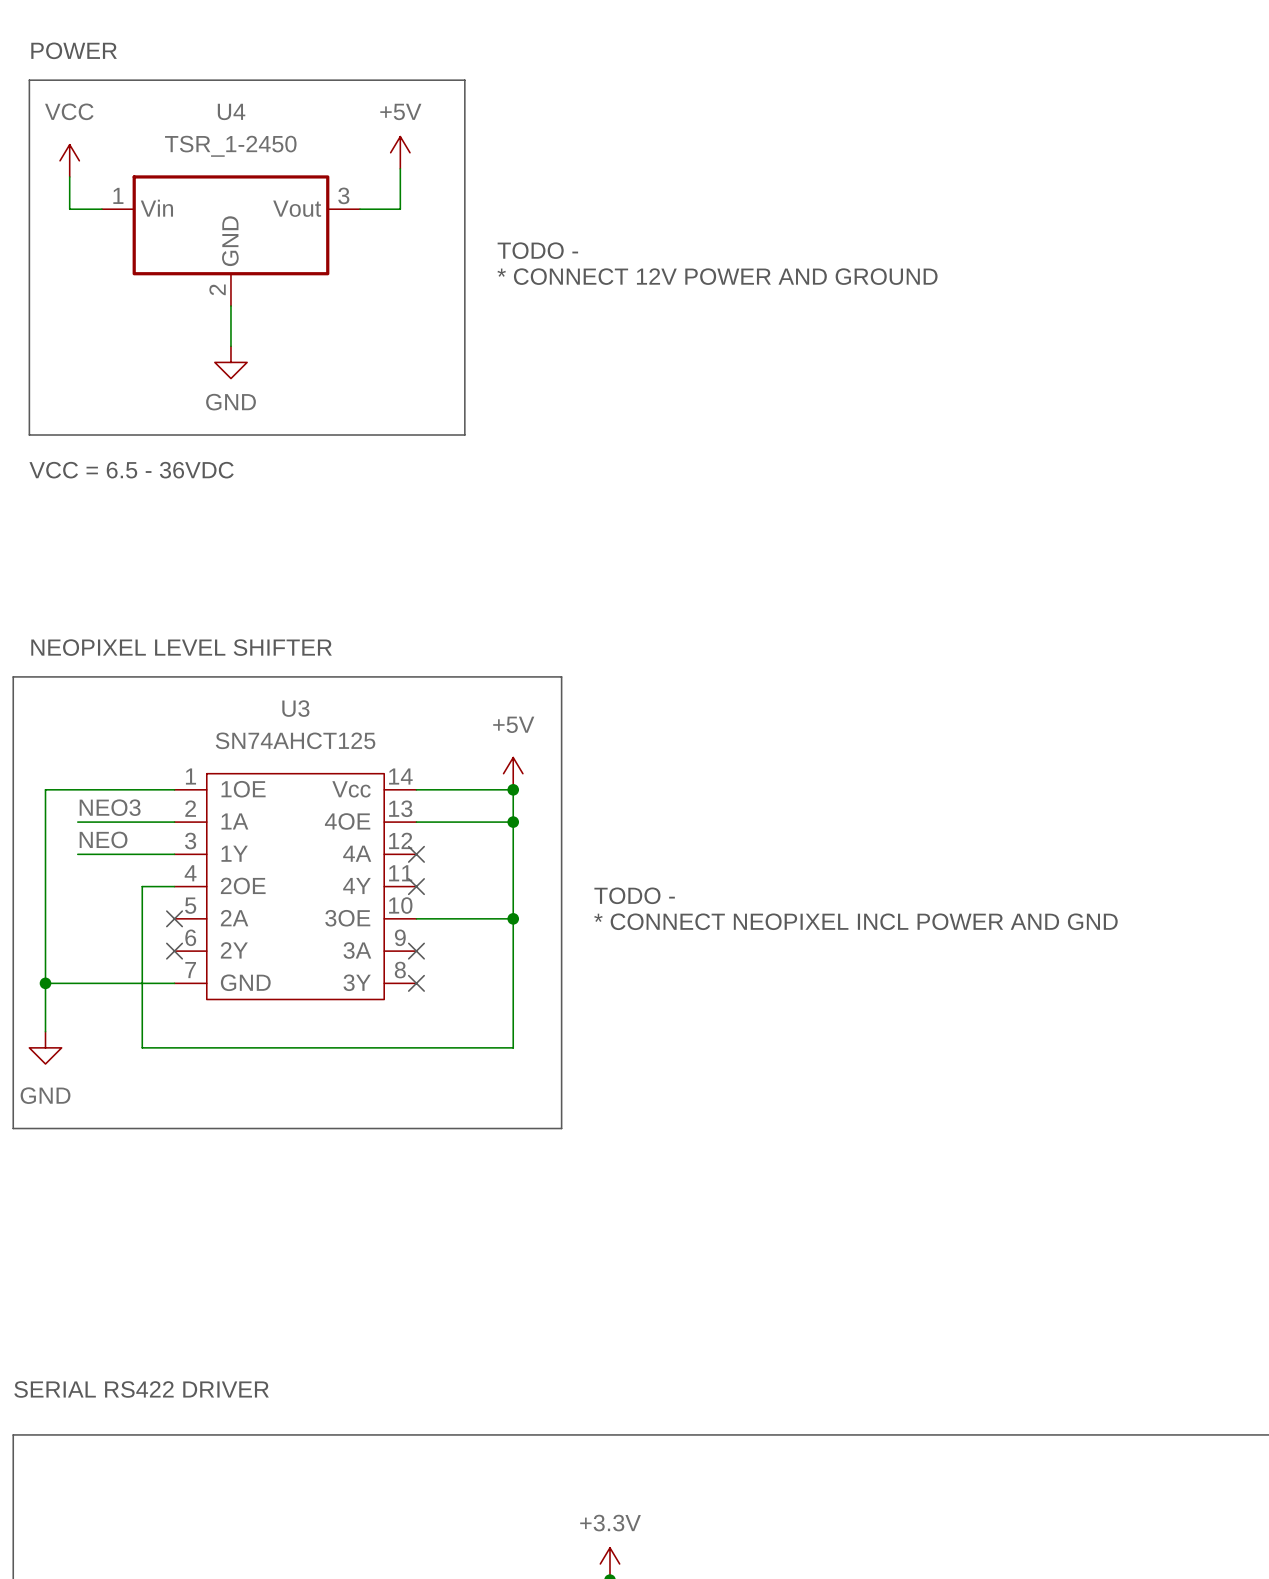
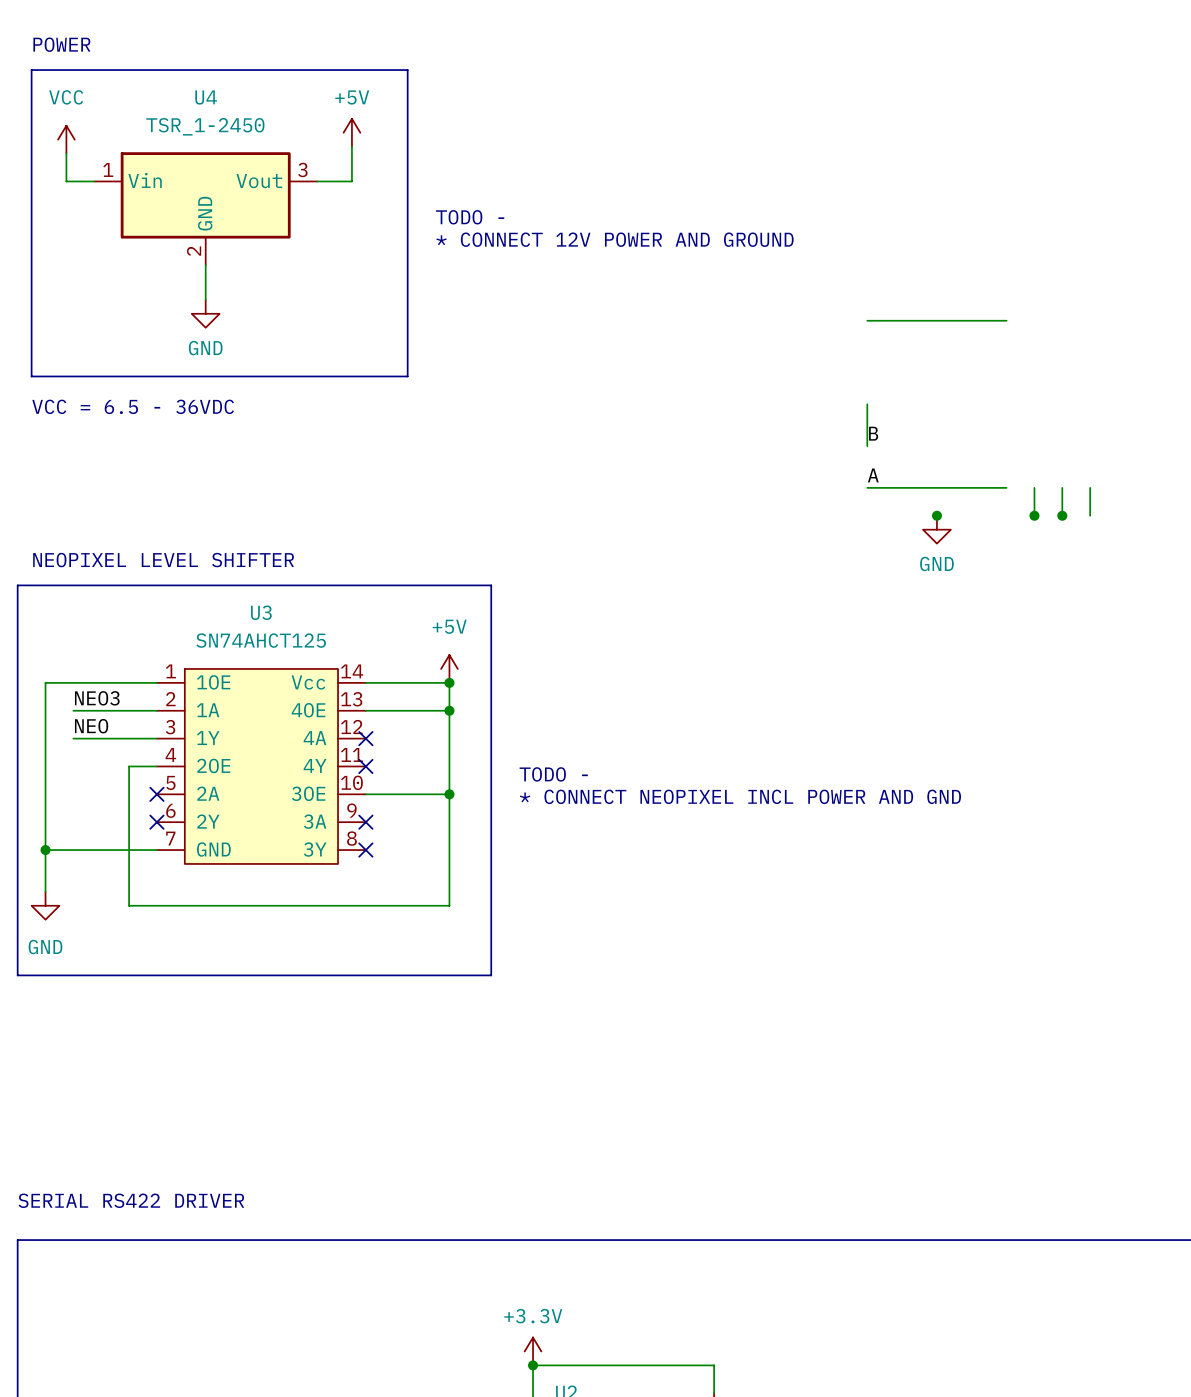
wire: none -> (867, 320) (1006, 320)
wire: none -> (867, 404) (867, 446)
label: none -> B (873, 433)
label: none -> A (873, 475)
wire: none -> (867, 487) (1006, 487)
wire: none -> (1034, 487) (1034, 515)
wire: none -> (1062, 487) (1062, 515)
wire: none -> (1090, 487) (1090, 515)
junction: none -> (936, 515)
junction: none -> (1034, 515)
junction: none -> (1062, 515)
power symbol: none -> GND (936, 529)

